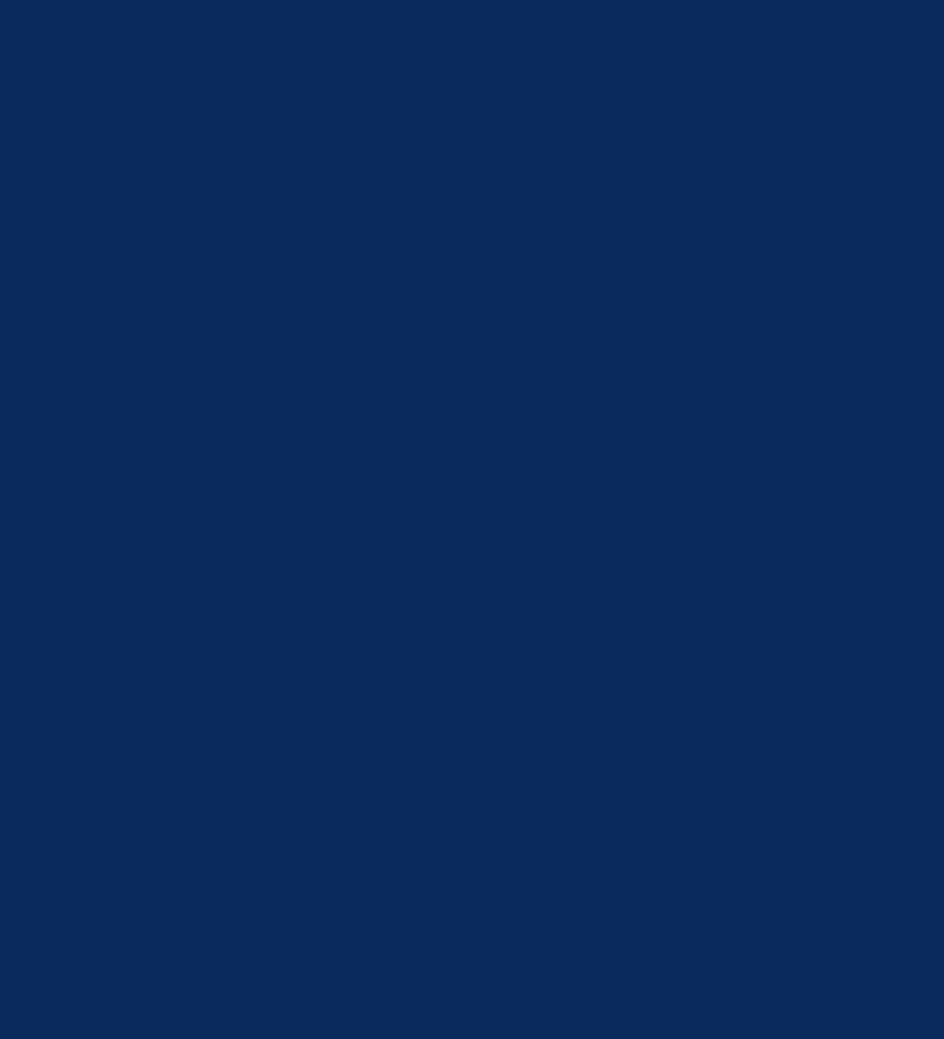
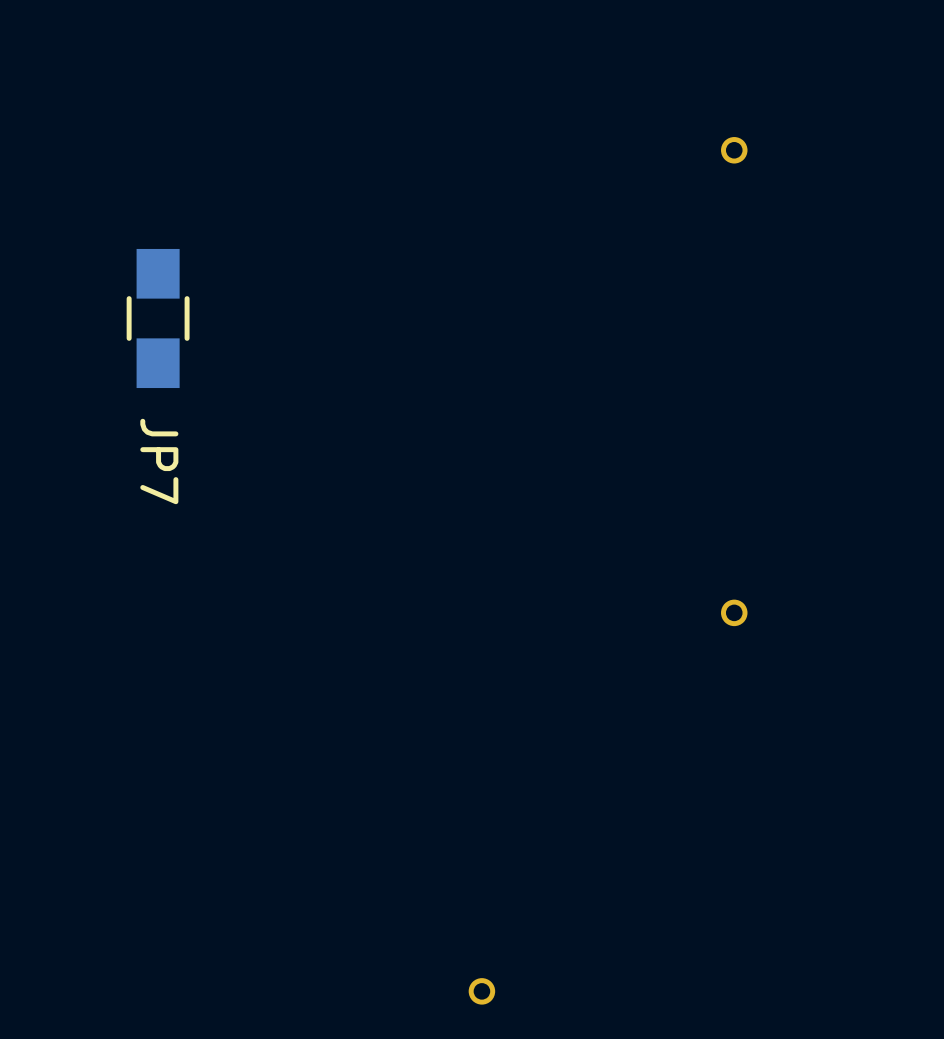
part: none -> (734, 150)
JP7: none -> (158, 318)
part: none -> (734, 612)
part: none -> (481, 991)

